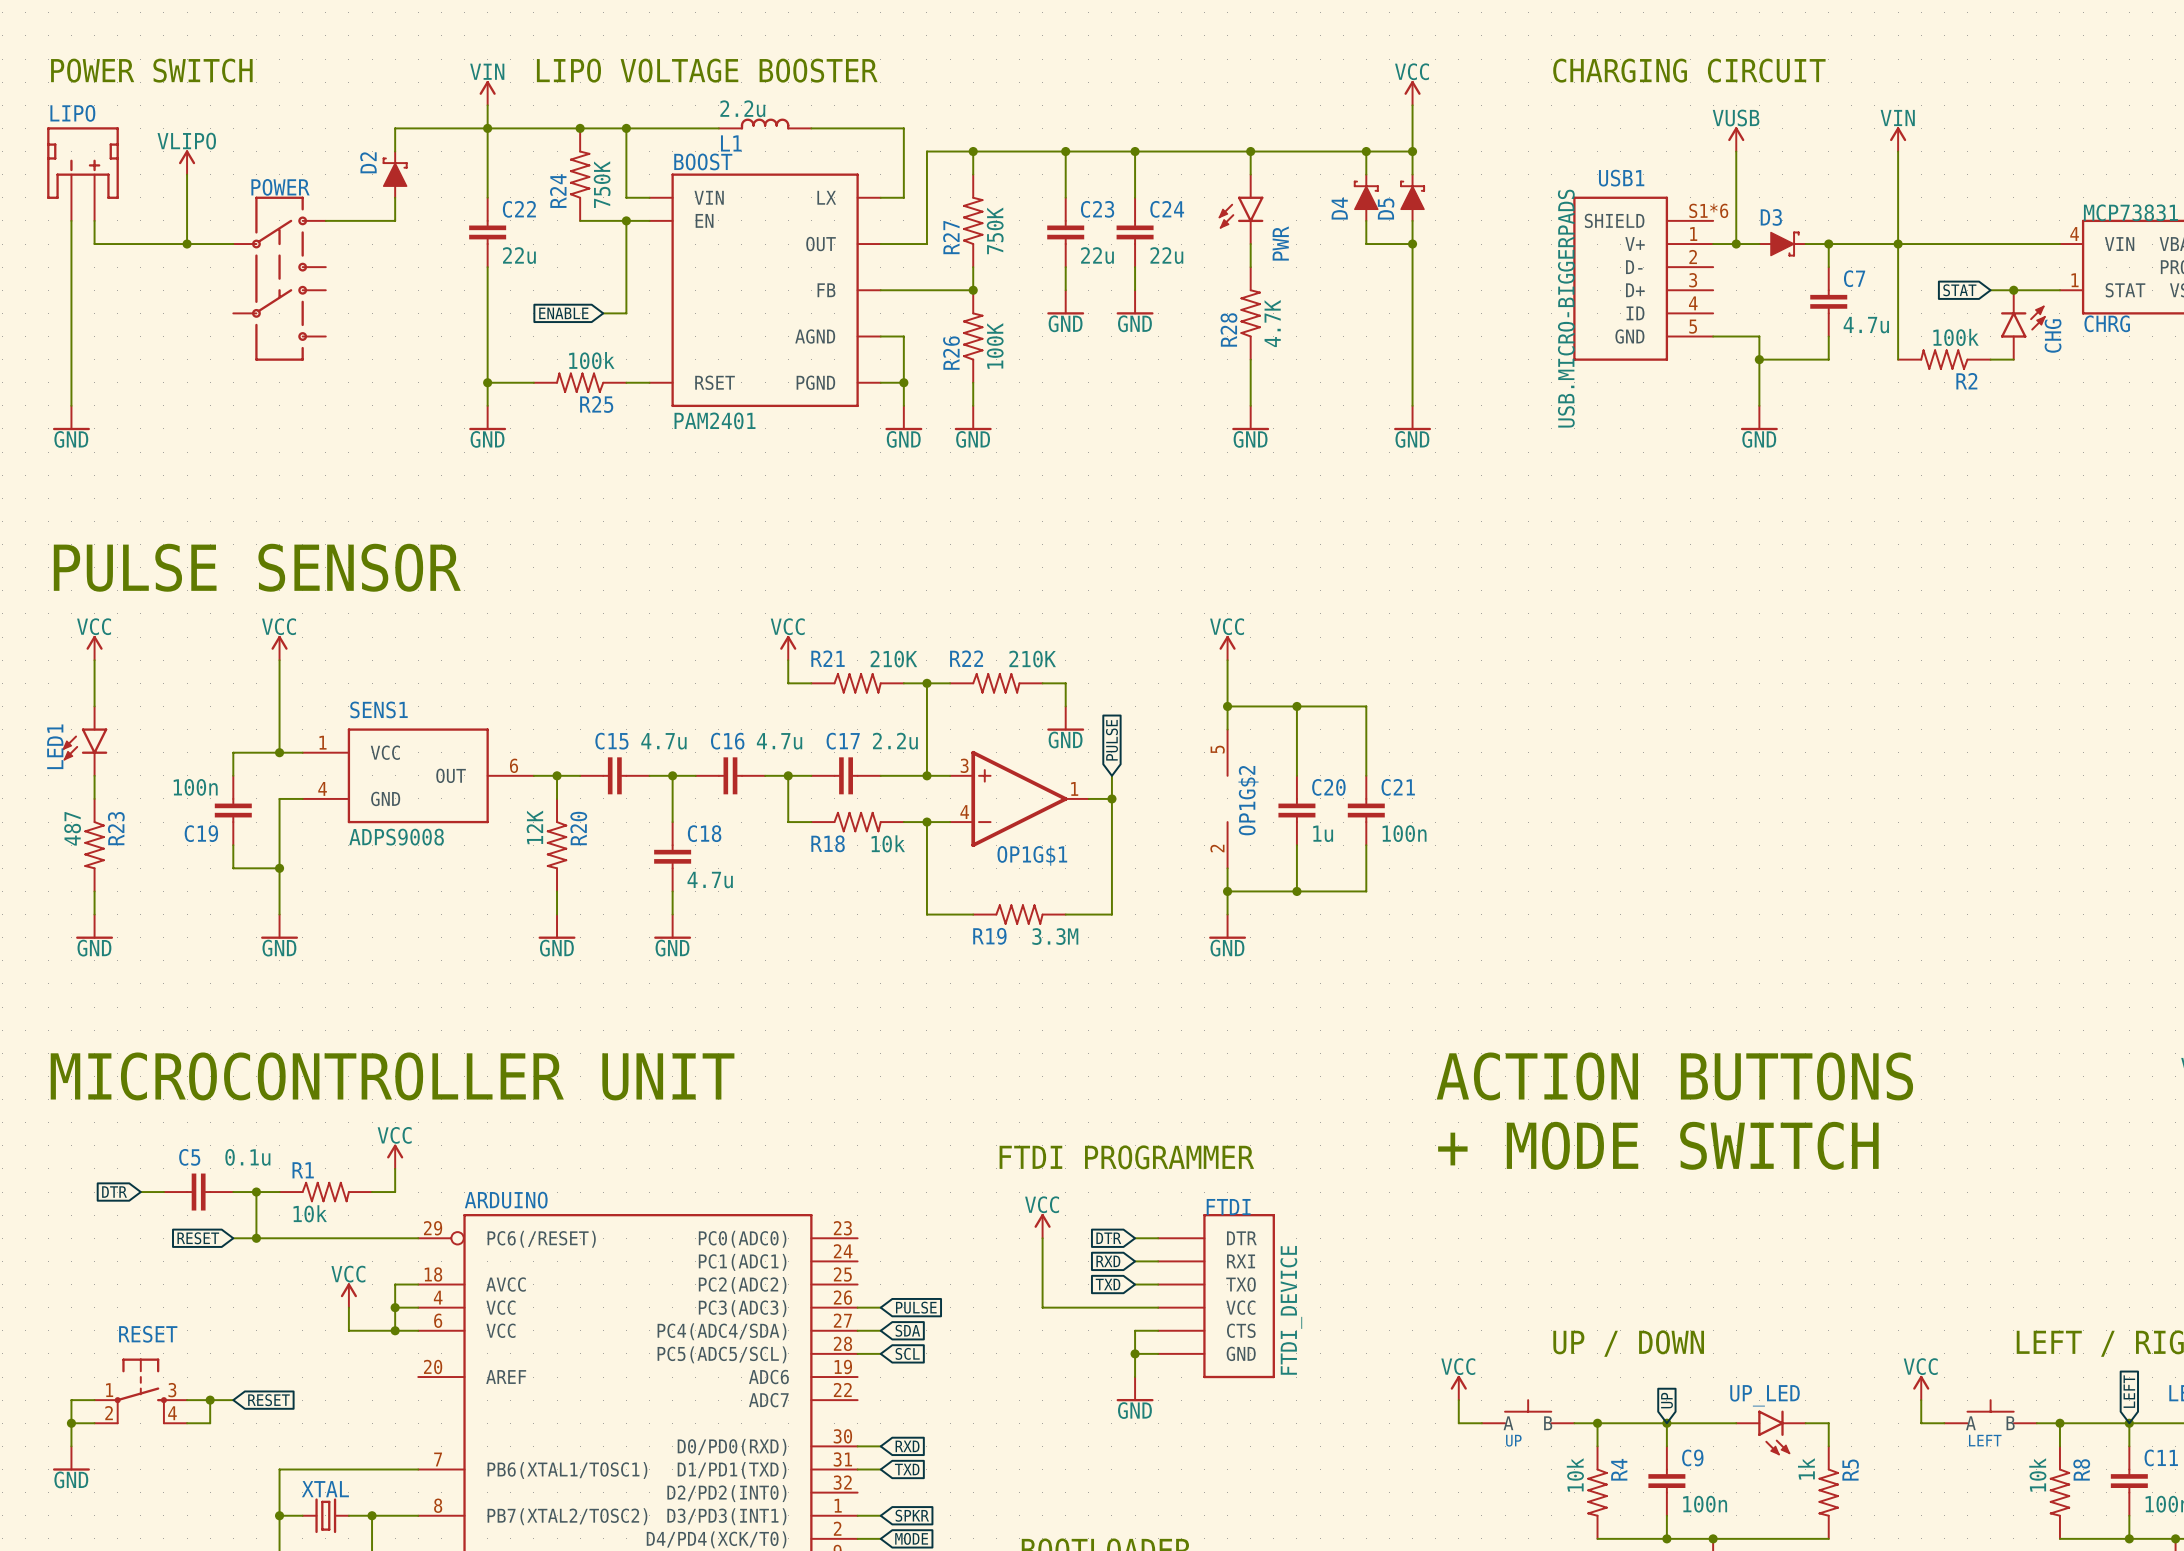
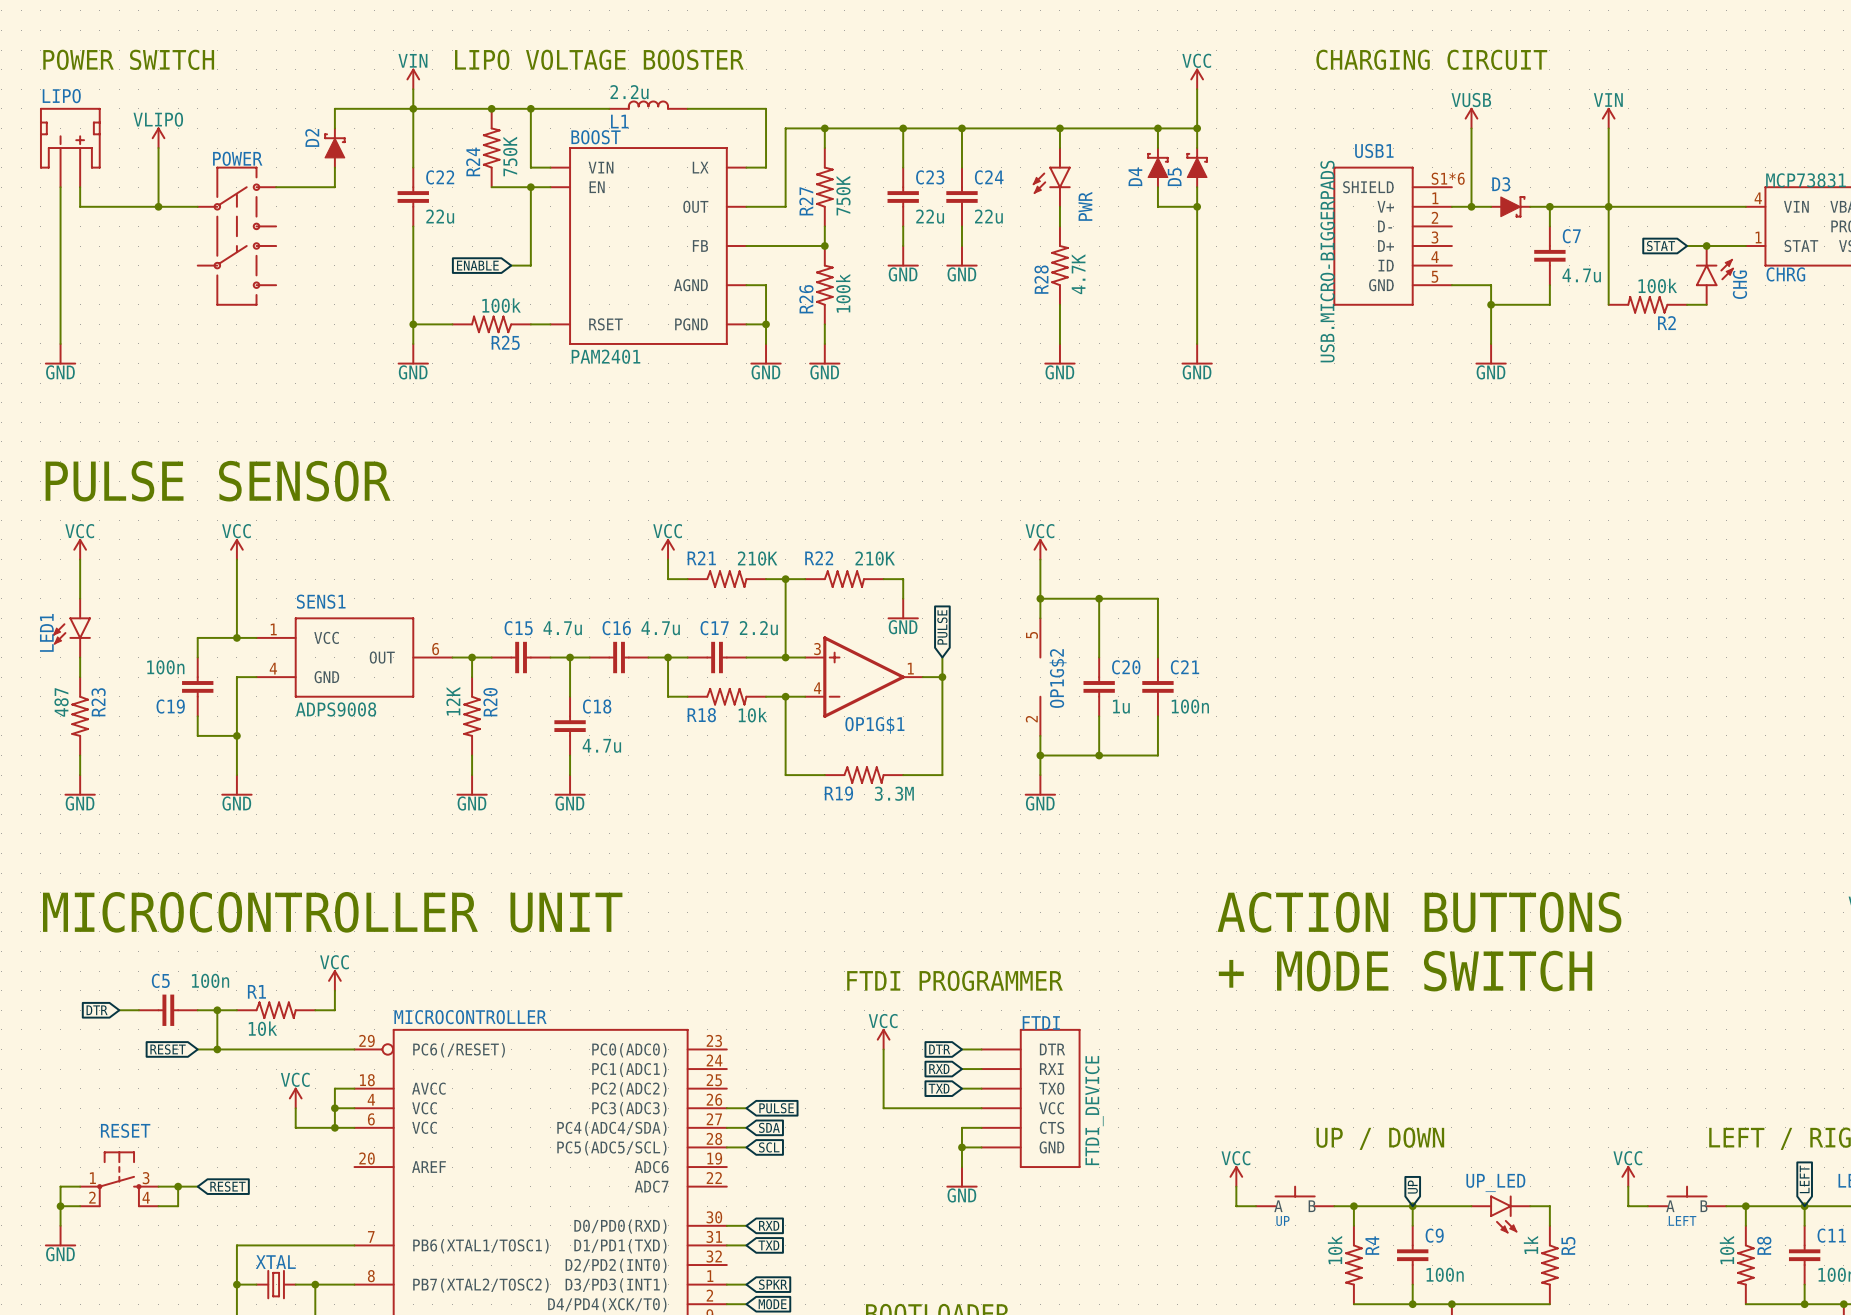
R26 value: 100K (995, 345) -> 100k (843, 293)
C5 value: 0.1u (247, 1157) -> 100n (210, 980)
ARDUINO name: ARDUINO (506, 1200) -> MICROCONTROLLER (470, 1017)

